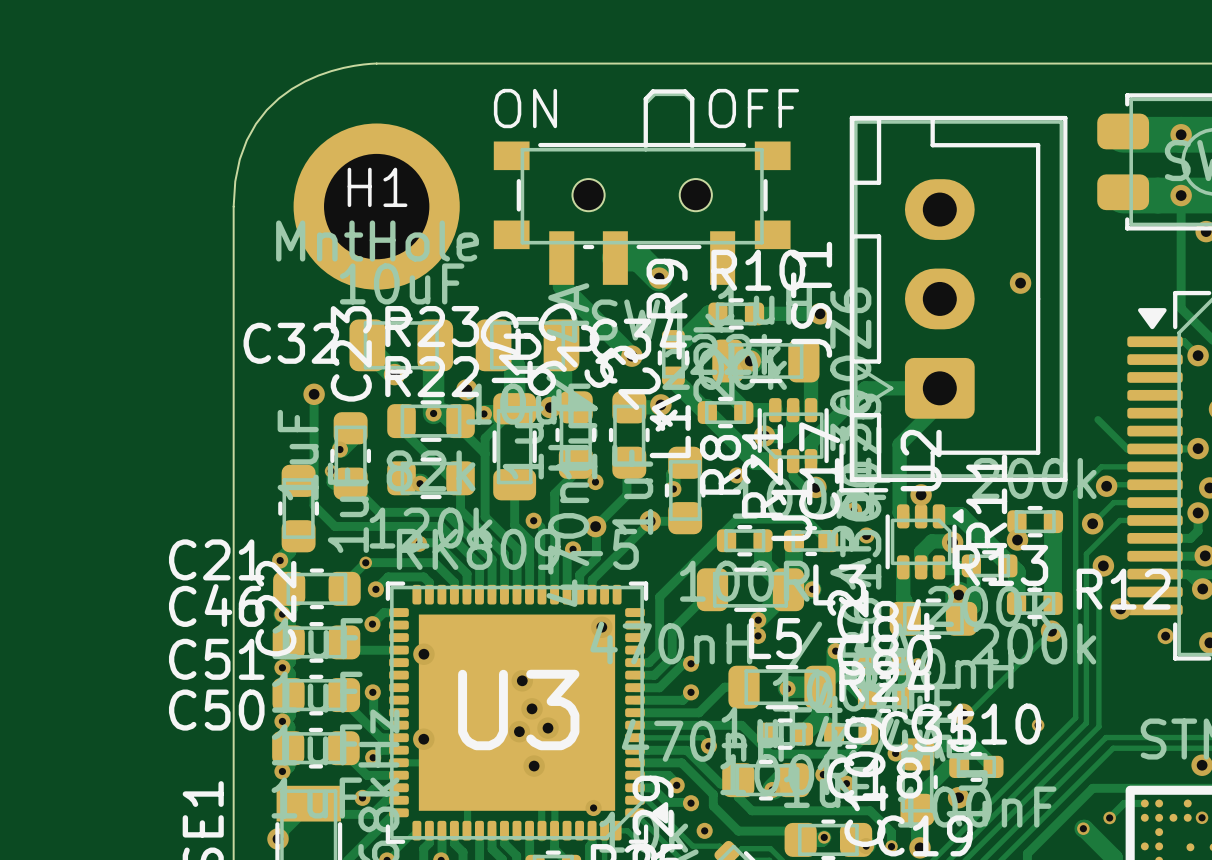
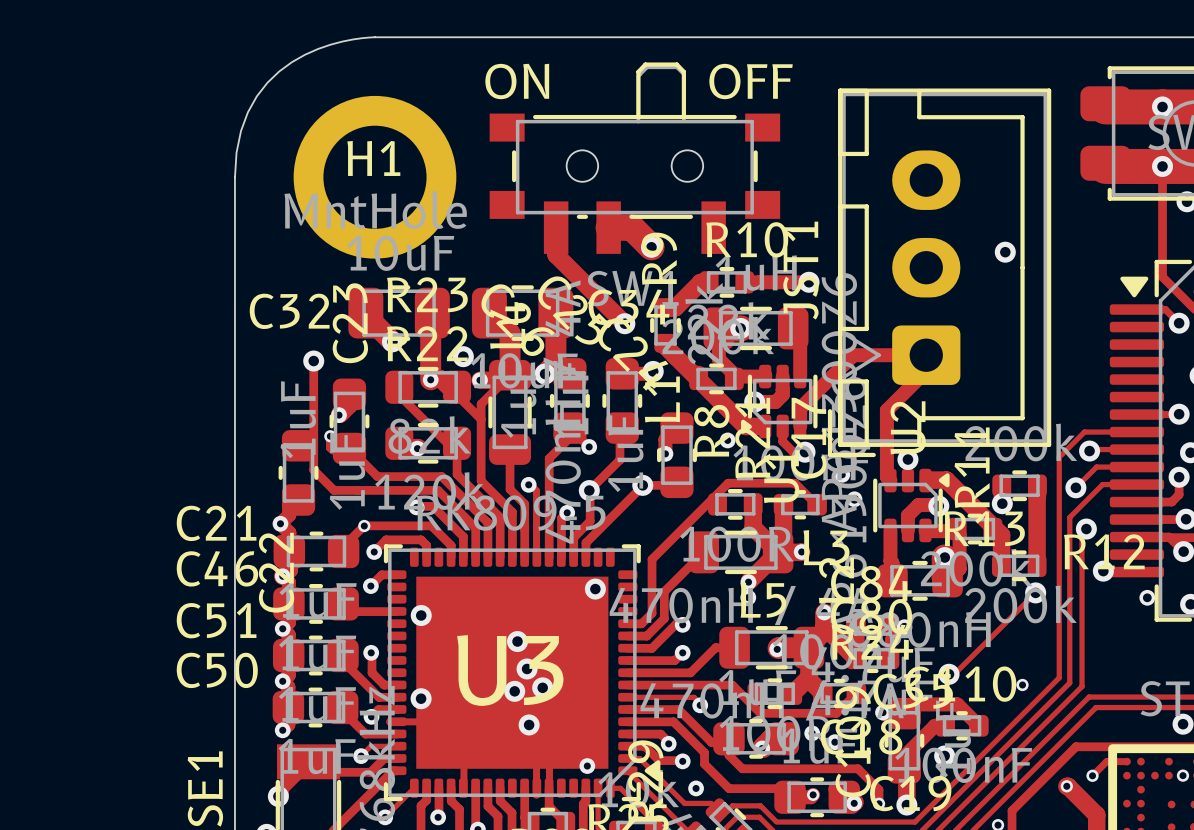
track: (1097, 419) (1127, 448) (1155, 448) -> none

